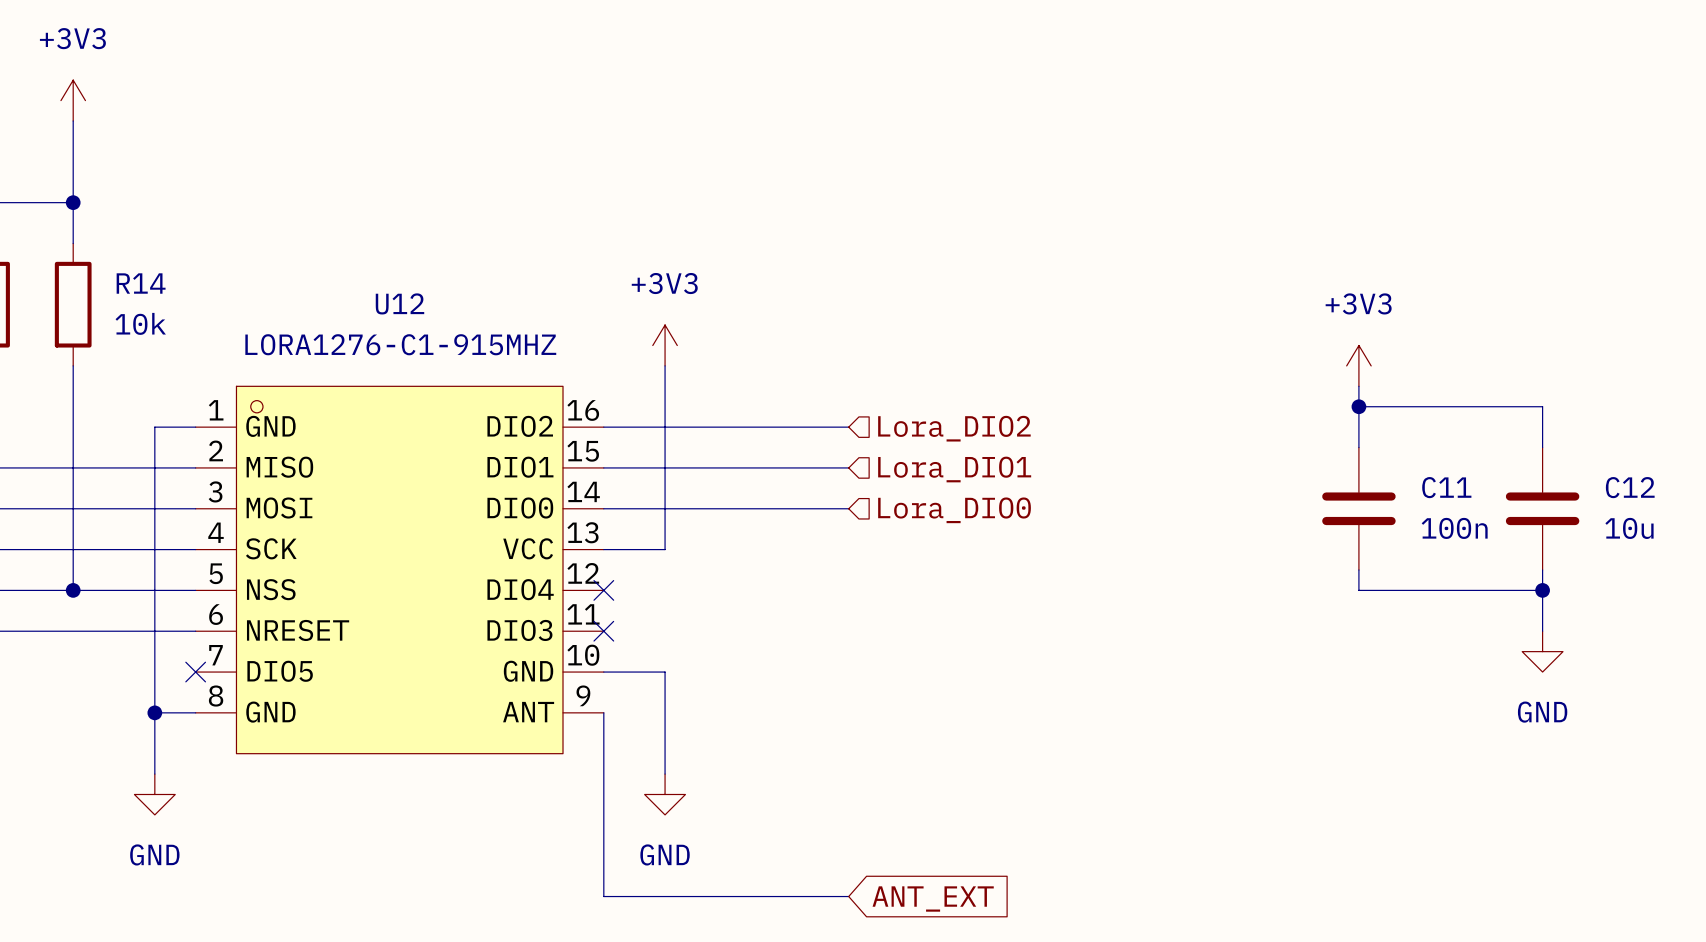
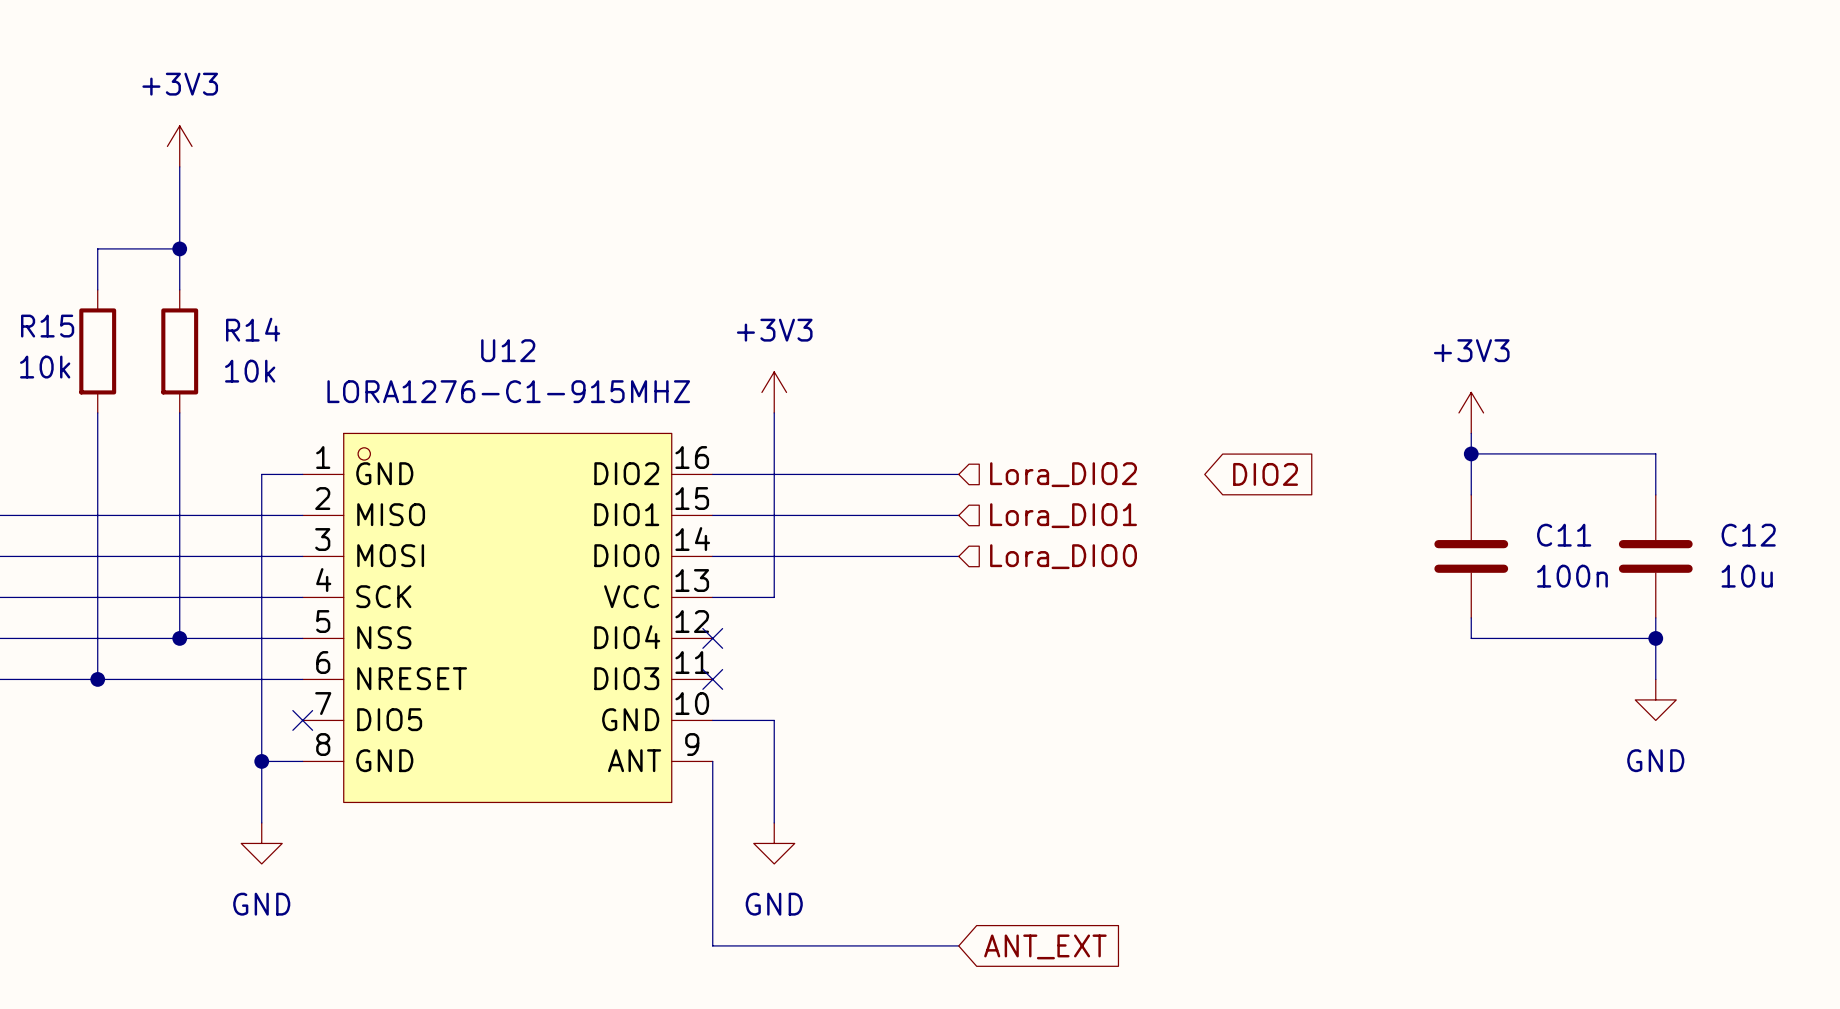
global label: none -> DIO2 (1265, 474)

